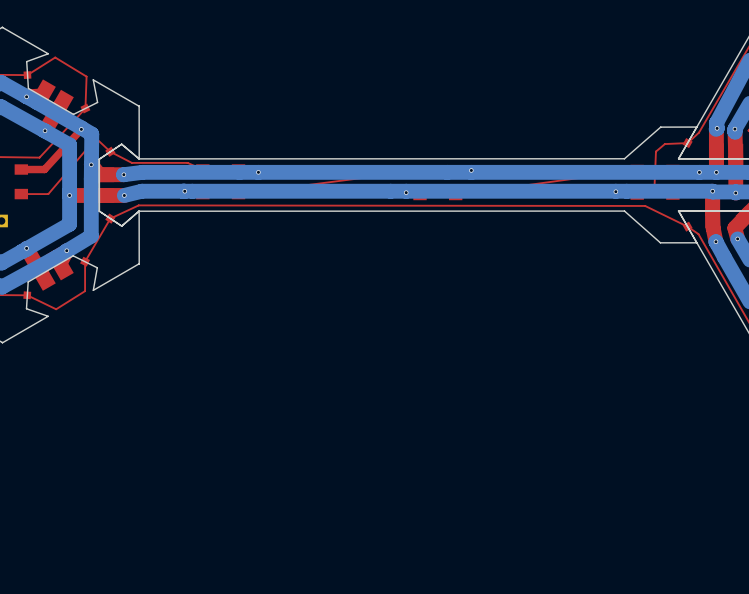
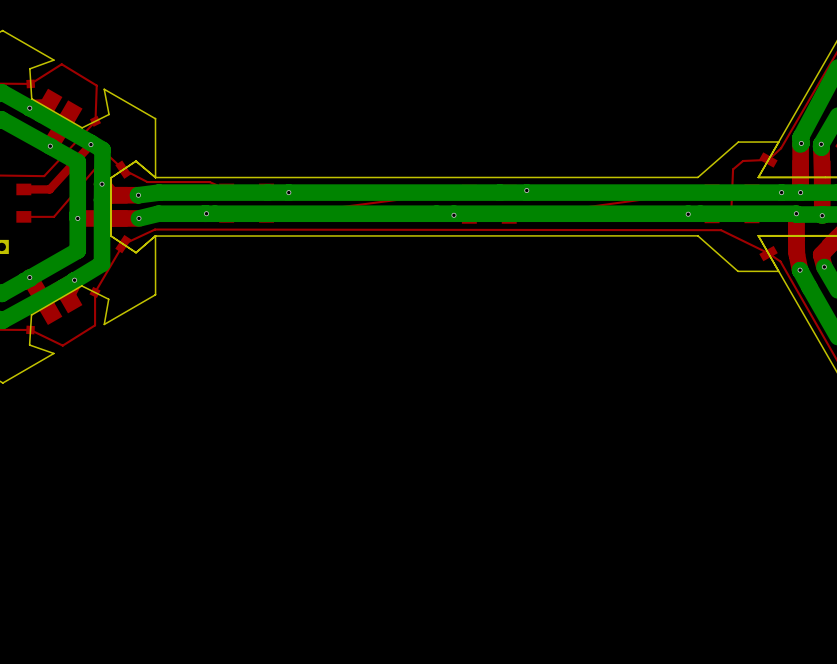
part: none -> (764, 157)
part: (687, 143) -> none
part: none -> (772, 162)
part: none -> (121, 166)
part: (110, 151) -> none
part: none -> (125, 173)
part: none -> (125, 240)
part: (110, 218) -> none
part: none -> (121, 247)
part: none -> (772, 251)
part: (687, 226) -> none
part: none -> (764, 255)

